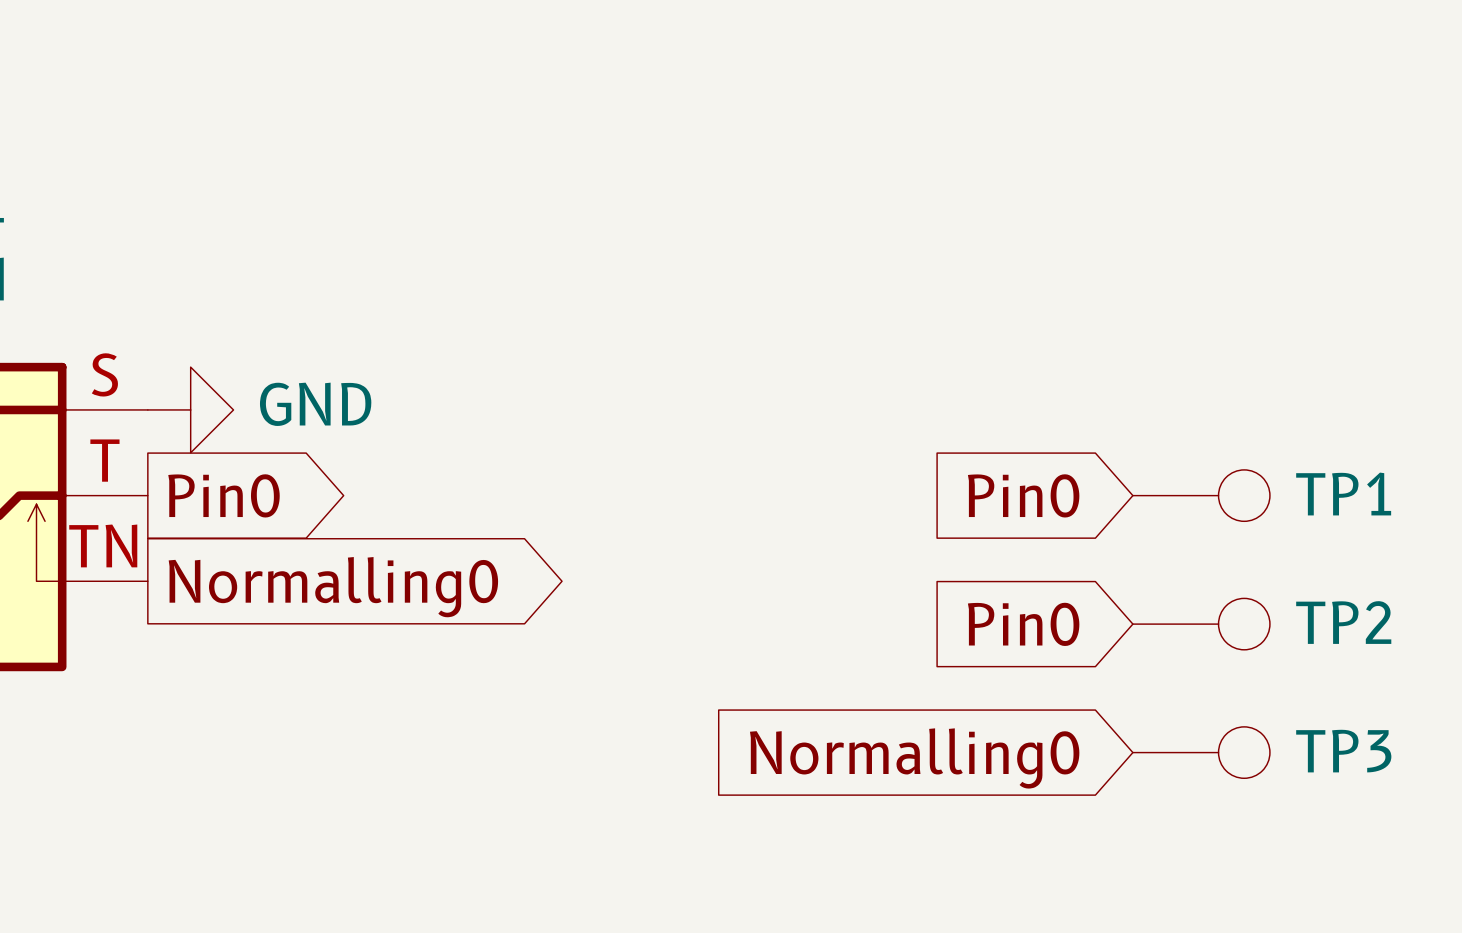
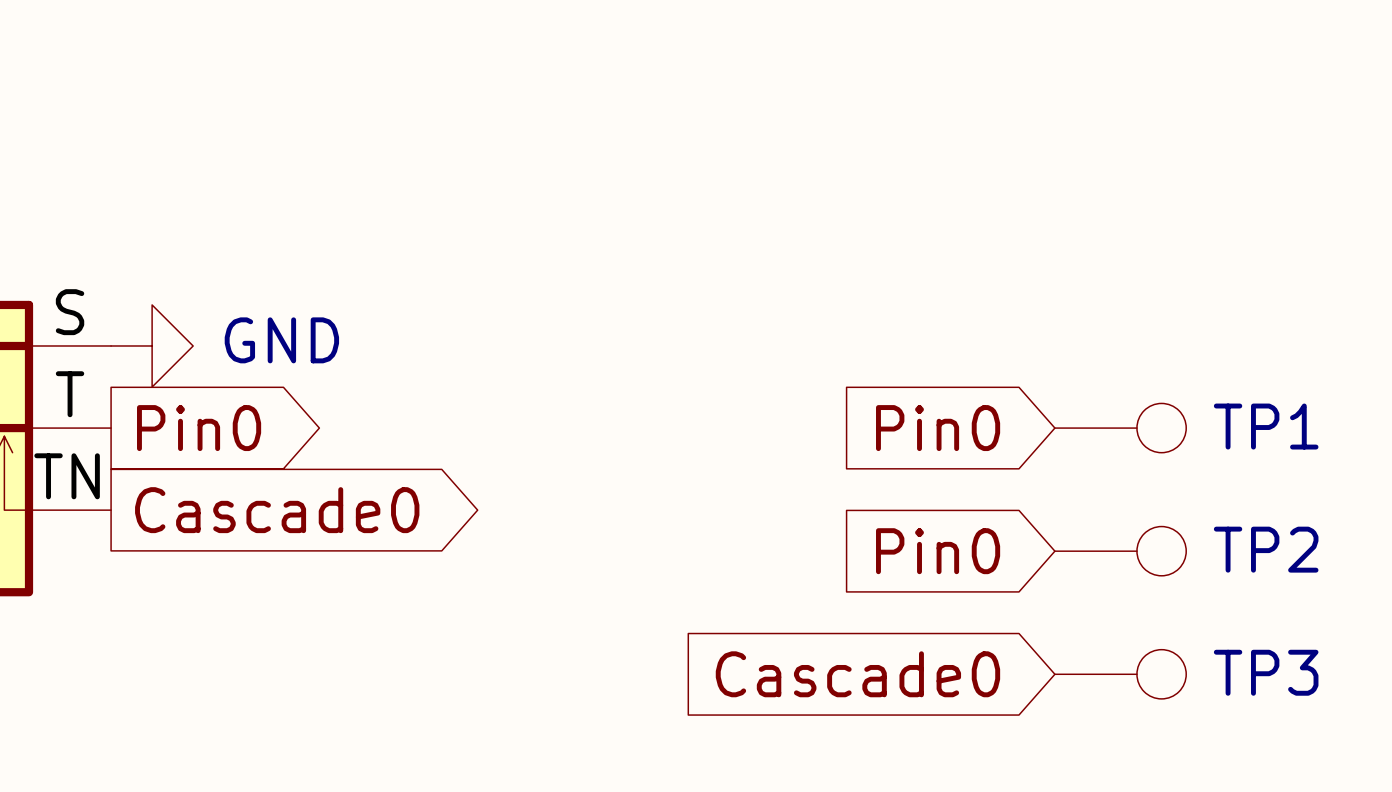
global label: Normalling0 (333, 587) -> Cascade0 (277, 510)
global label: Normalling0 (914, 758) -> Cascade0 (857, 674)

